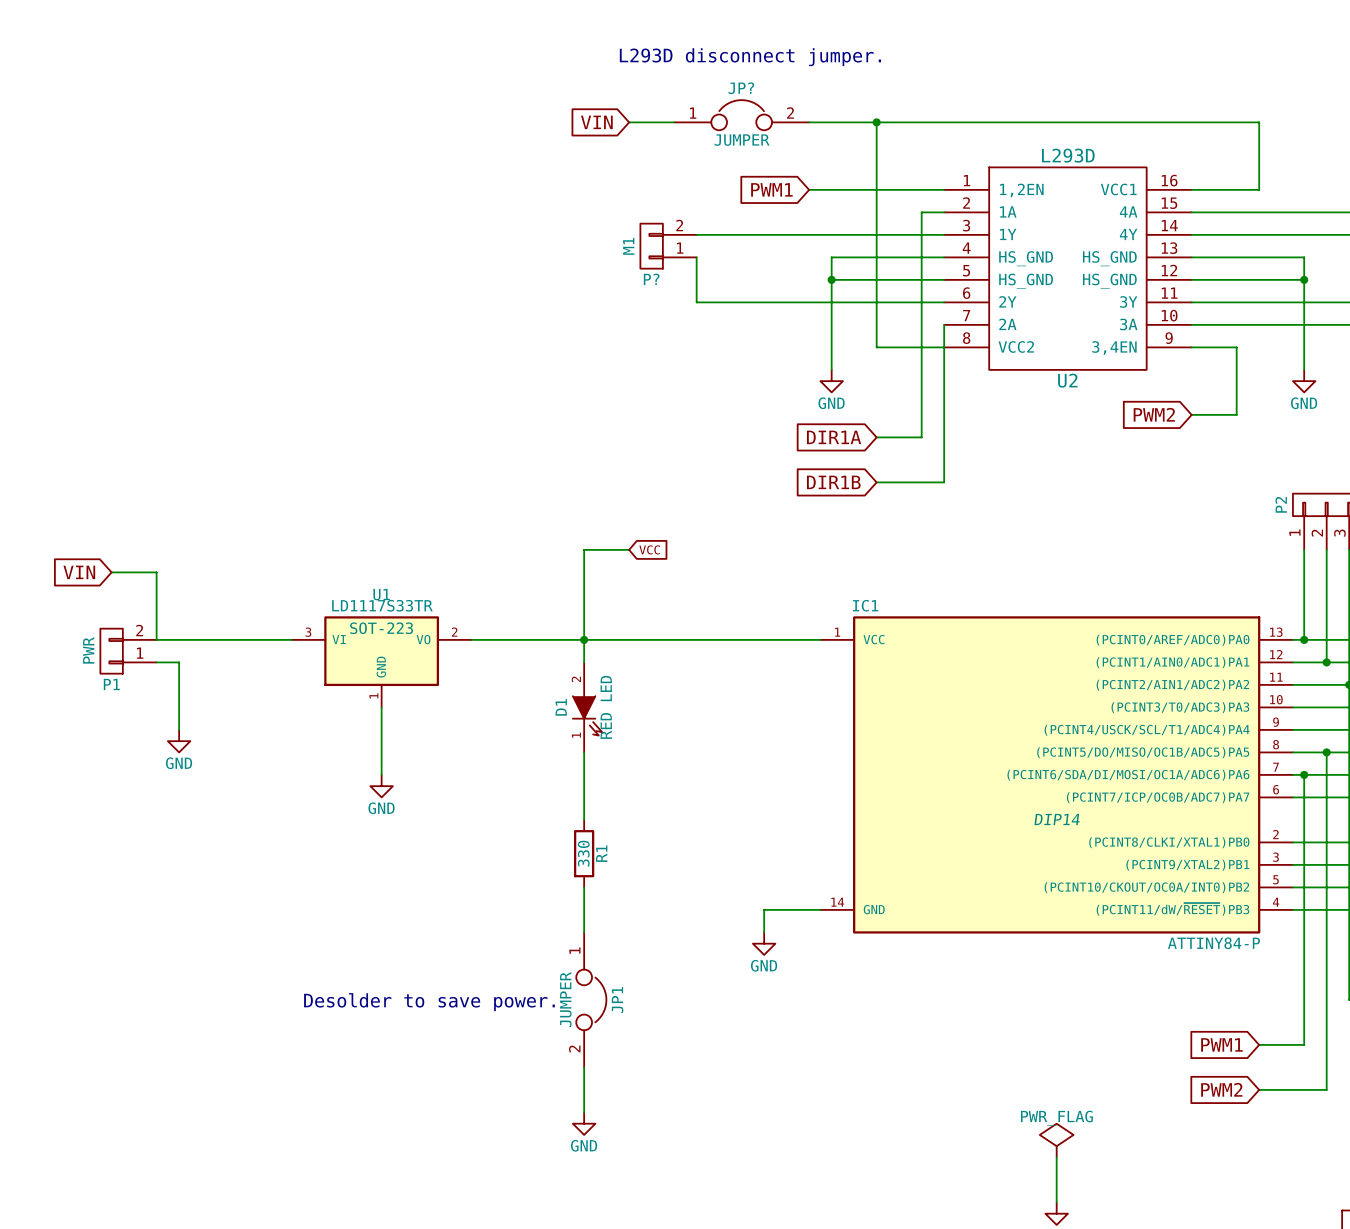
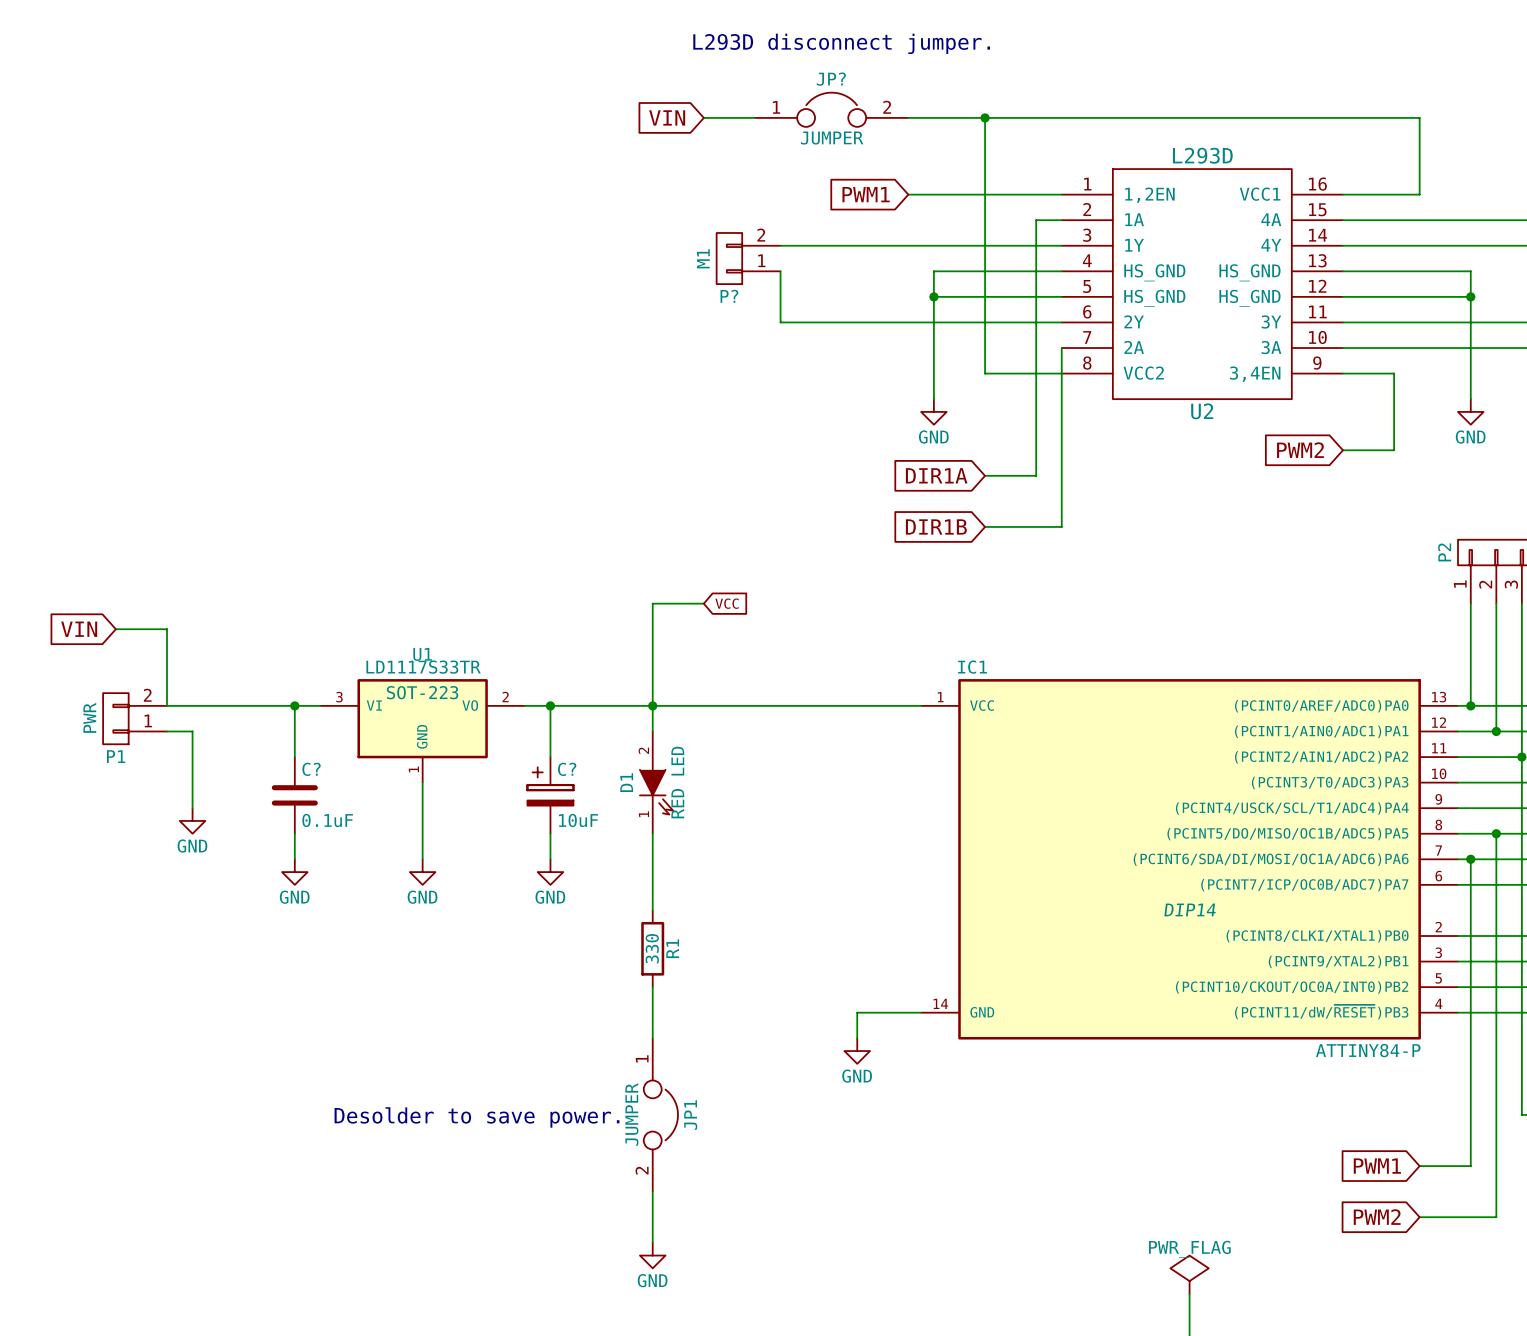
wire: none -> (294, 705) (294, 757)
junction: none -> (294, 705)
wire: none -> (550, 705) (550, 757)
junction: none -> (550, 705)
C?: none -> 0.1uF (294, 795)
C?: none -> 10uF (550, 795)
wire: none -> (294, 833) (294, 859)
wire: none -> (550, 833) (550, 859)
power symbol: none -> GND (294, 872)
power symbol: none -> GND (550, 872)

